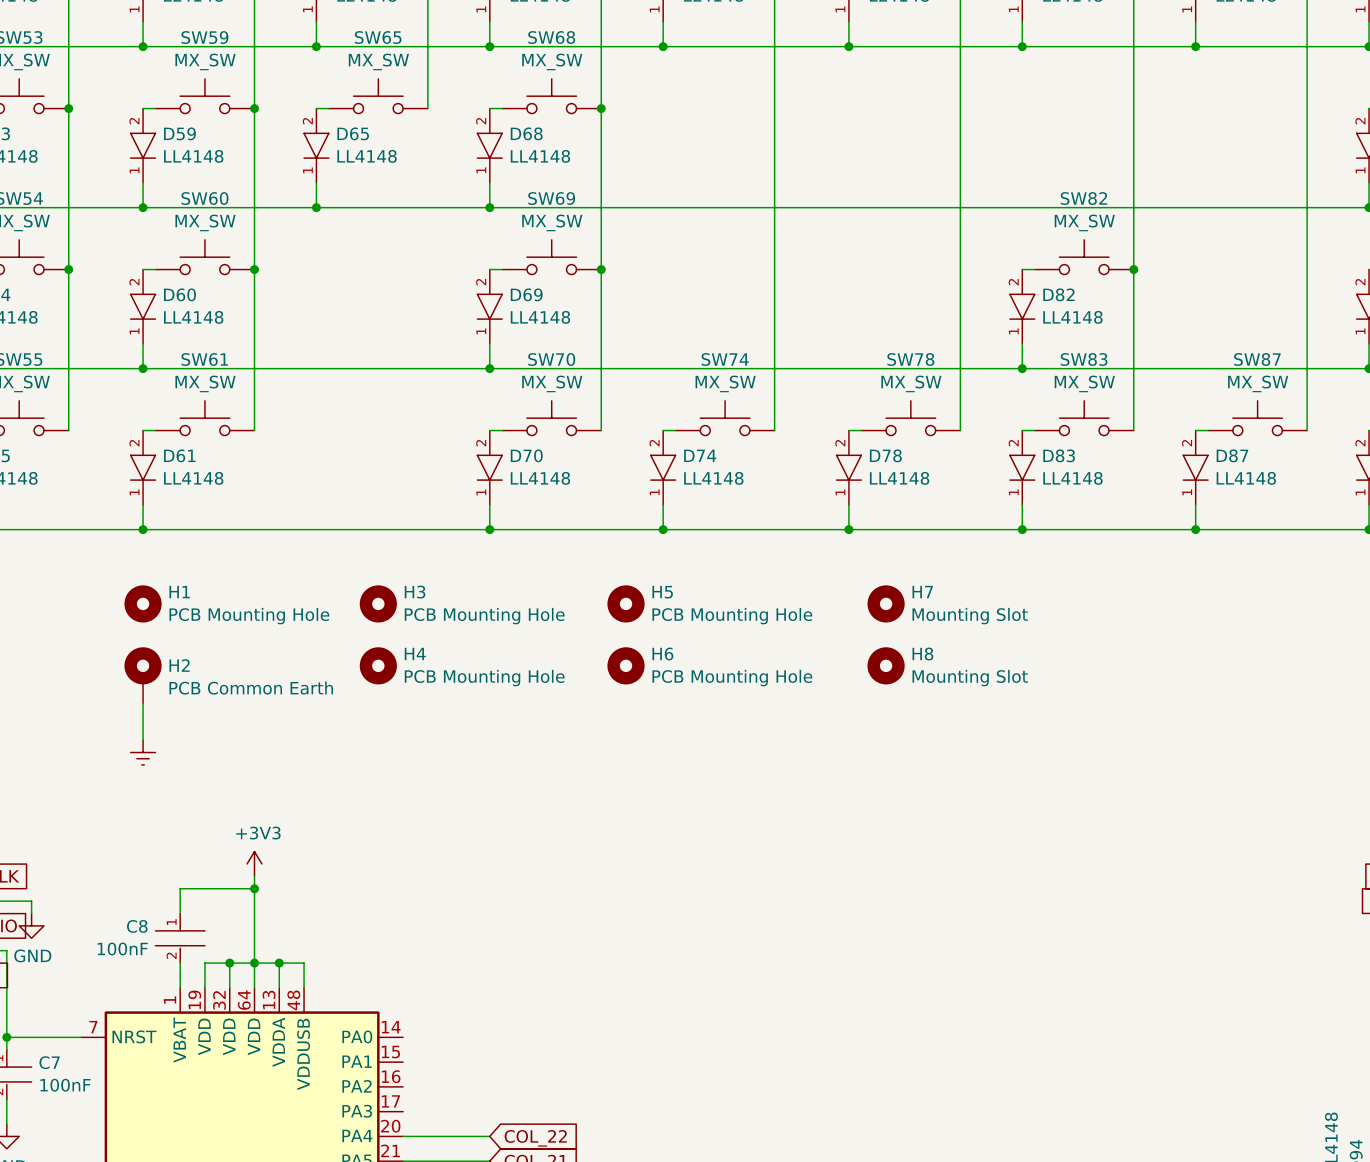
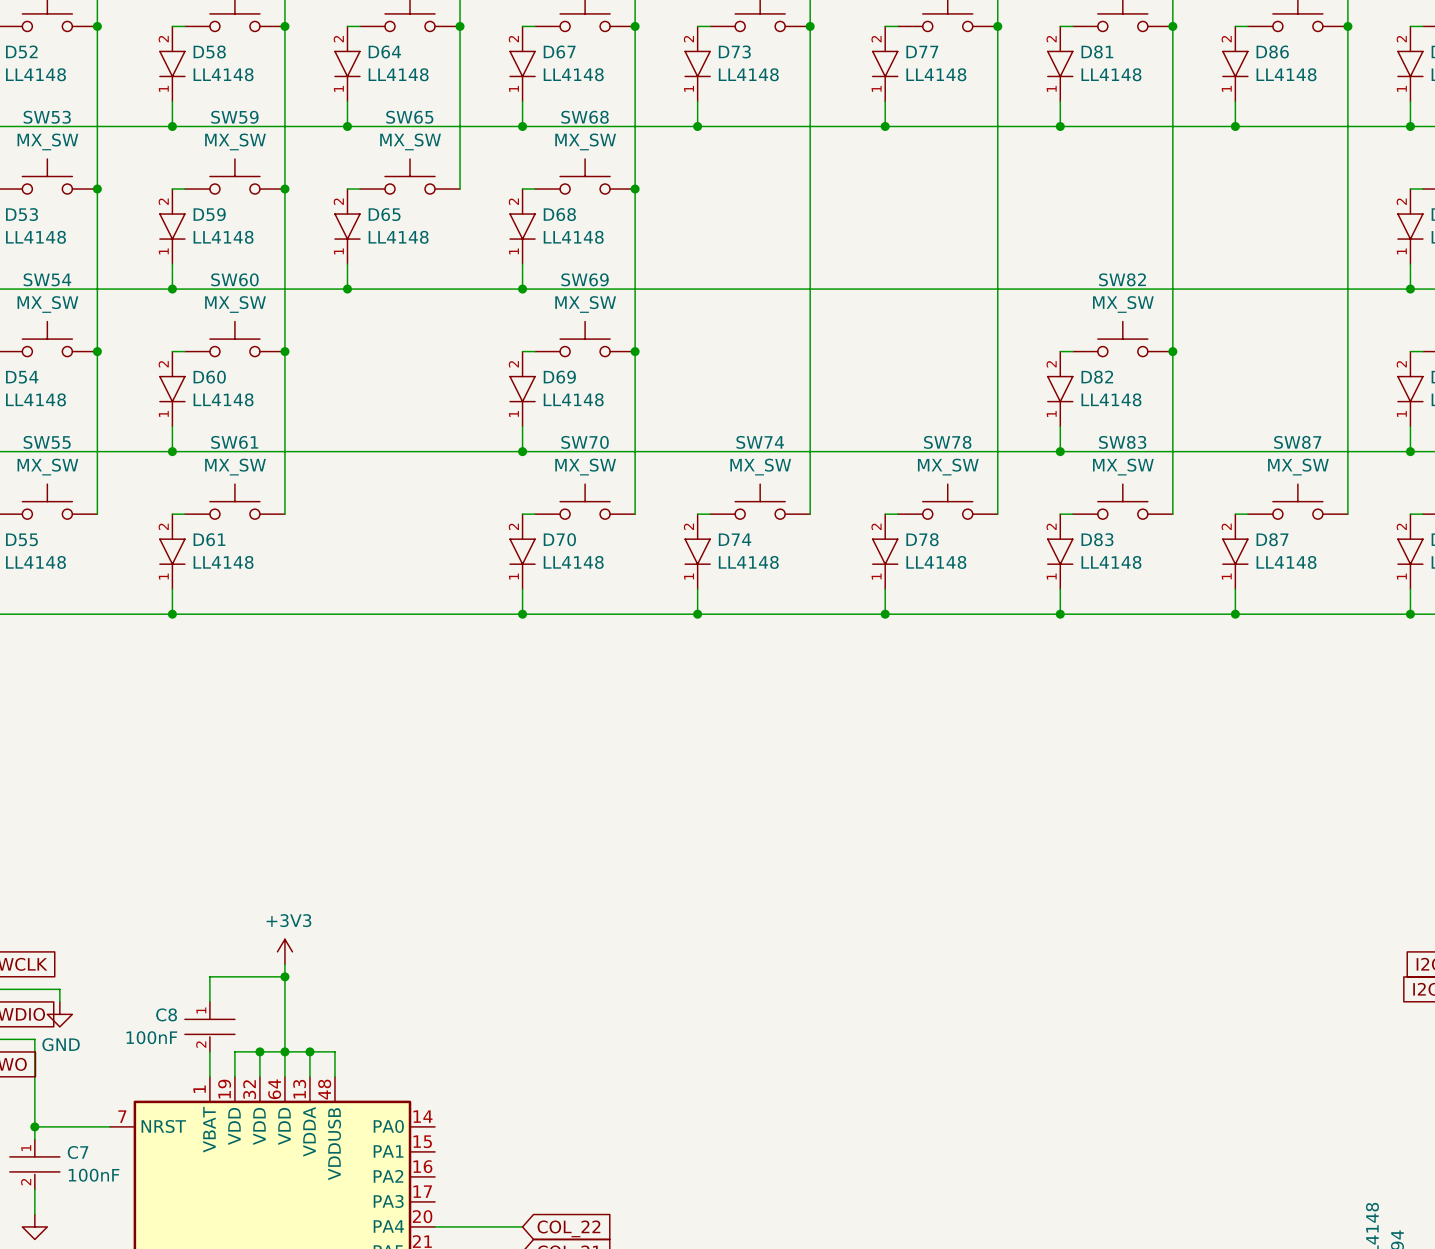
H1: PCB Mounting Hole (143, 603) -> none
H3: PCB Mounting Hole (378, 603) -> none
H5: PCB Mounting Hole (626, 603) -> none
H7: Mounting Slot (886, 603) -> none
H4: PCB Mounting Hole (378, 665) -> none
H6: PCB Mounting Hole (626, 665) -> none
H8: Mounting Slot (886, 665) -> none
H2: PCB Common Earth (143, 675) -> none
wire: (143, 702) (143, 740) -> none
power symbol: (143, 752) -> none

